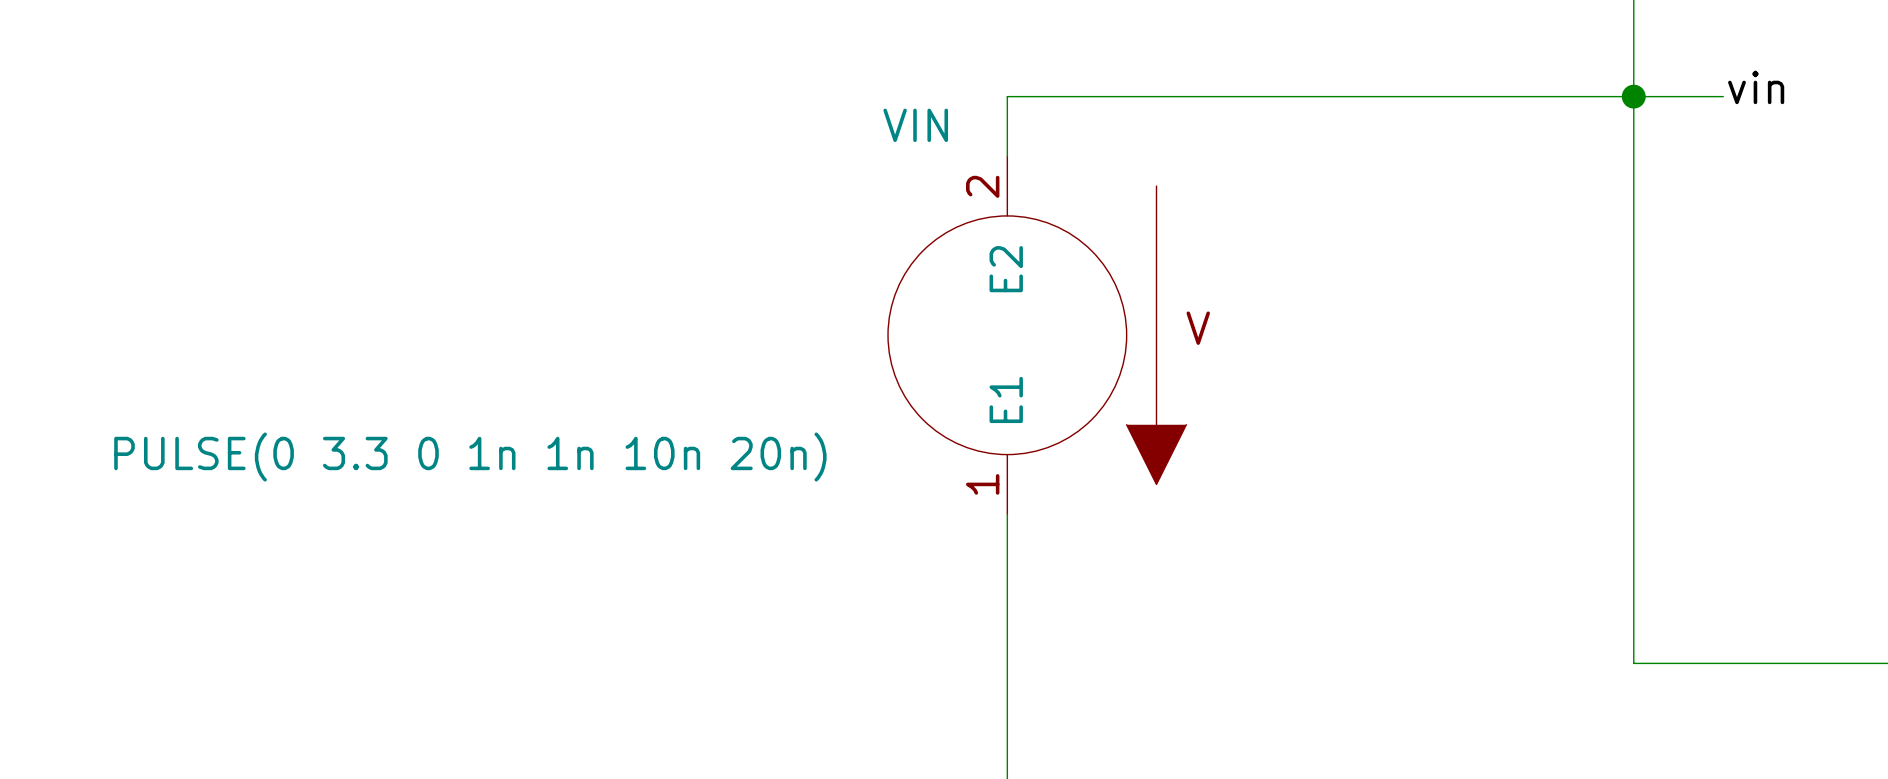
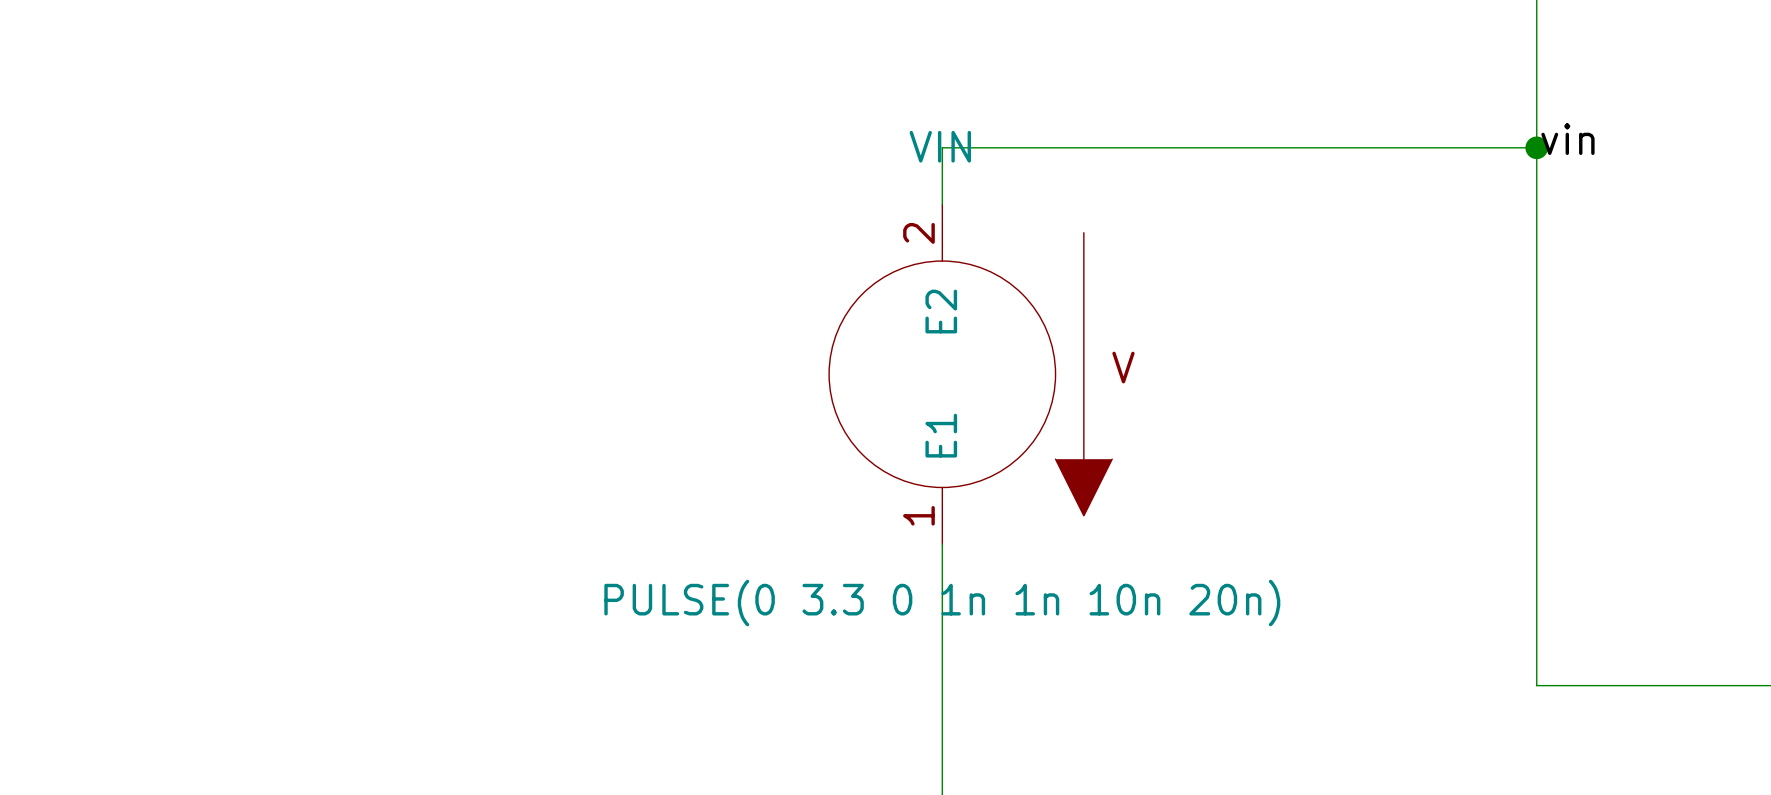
label position: vin (1756, 87) -> vin (1567, 139)
wire: (1633, 96) (1723, 96) -> none
VIN name position: VIN (915, 125) -> VIN (940, 146)
VIN value position: PULSE(0 3.3 0 1n 1n 10n 20n) (470, 457) -> PULSE(0 3.3 0 1n 1n 10n 20n) (942, 603)

